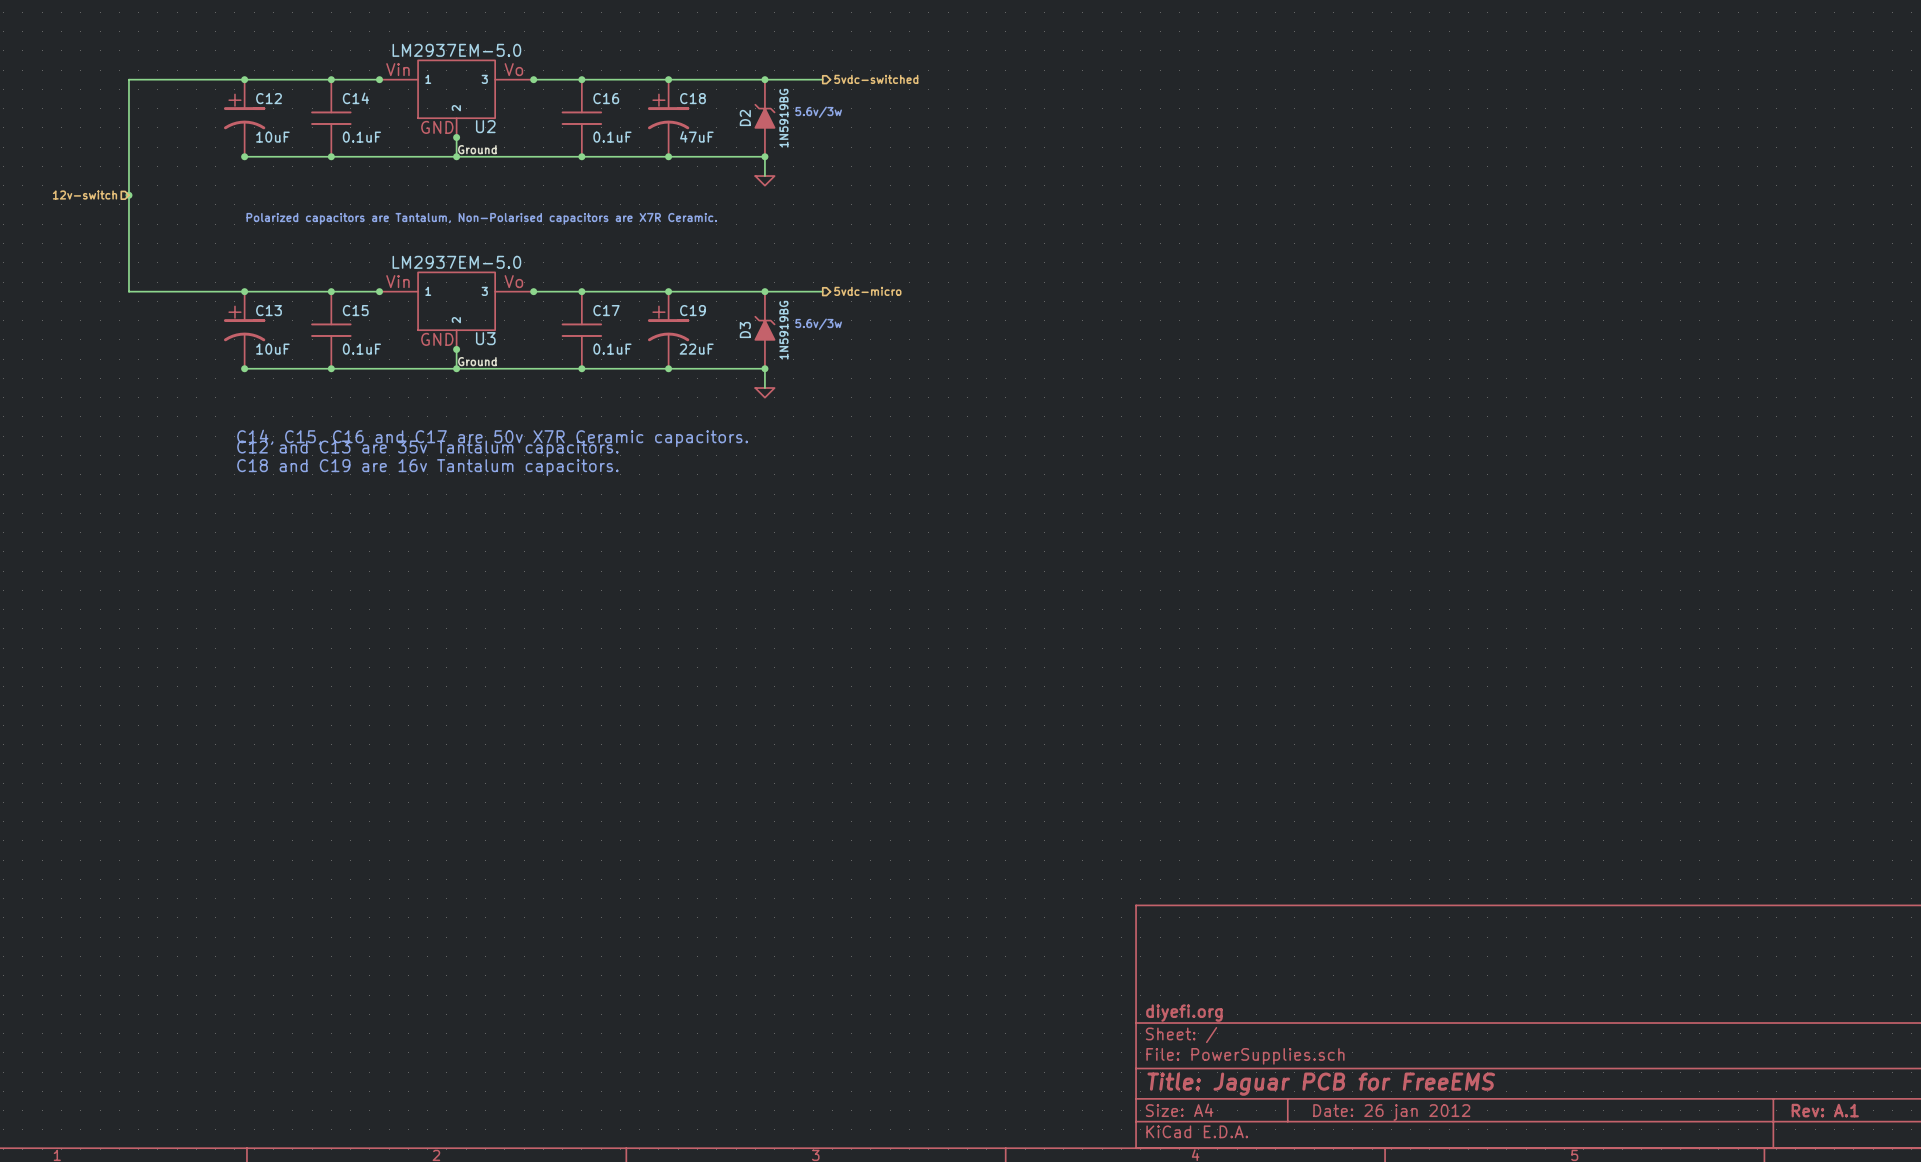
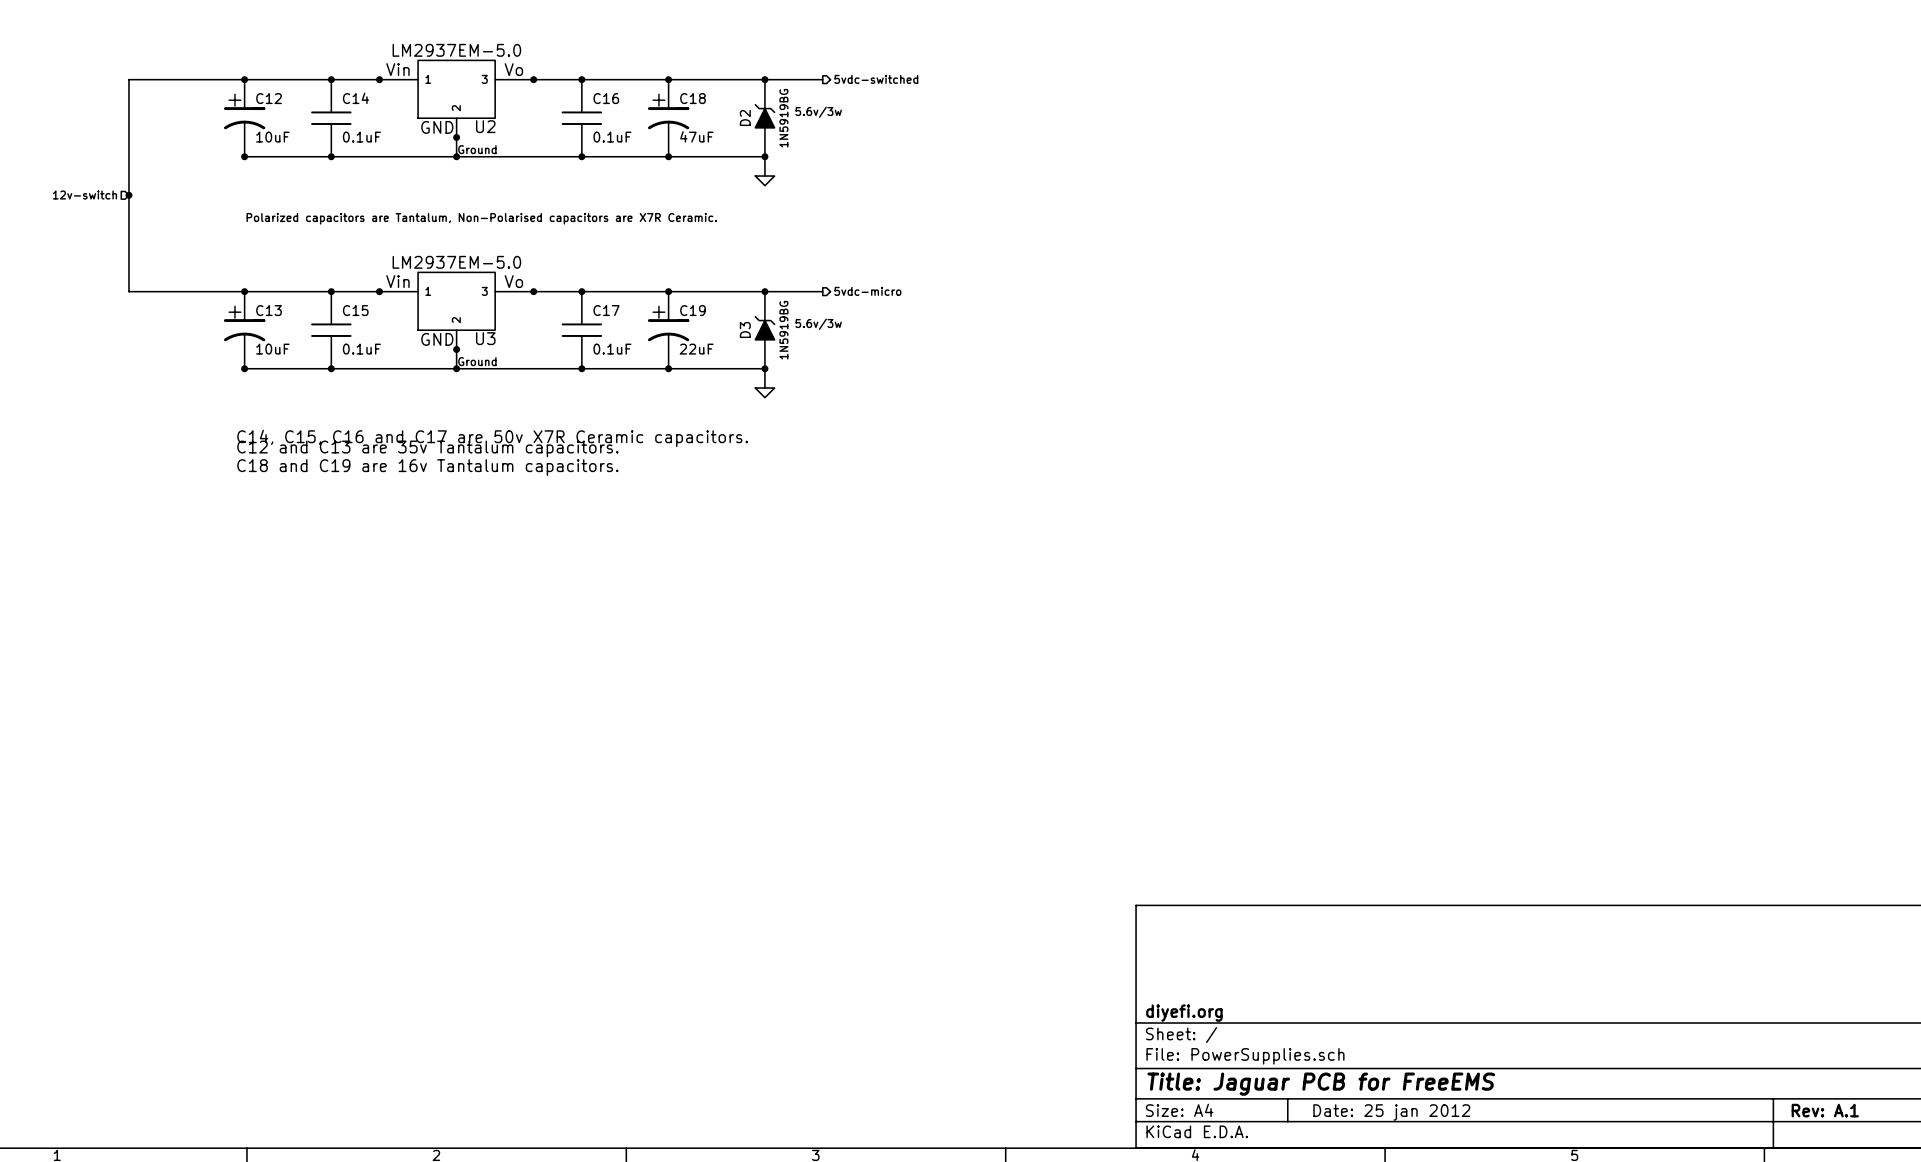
title block: Date: 26 jan 2012 (1391, 1112) -> Date: 25 jan 2012 (1391, 1112)

